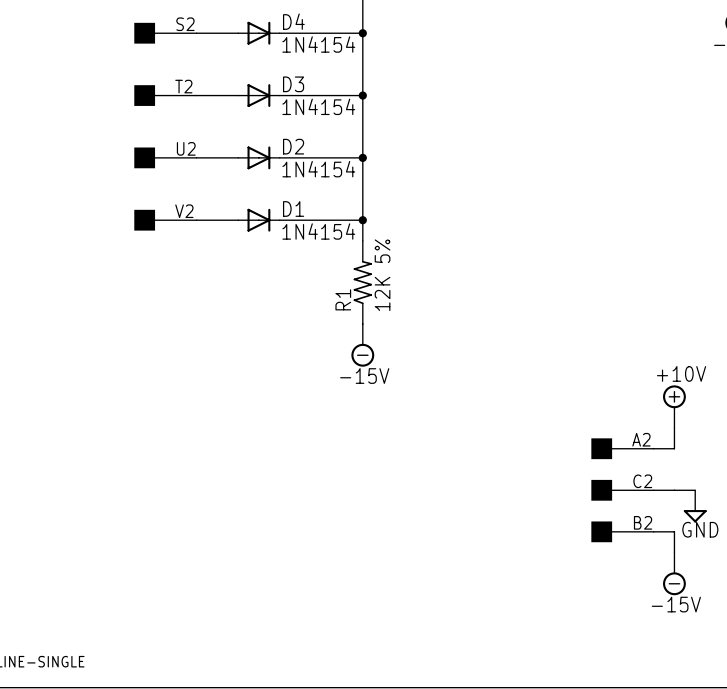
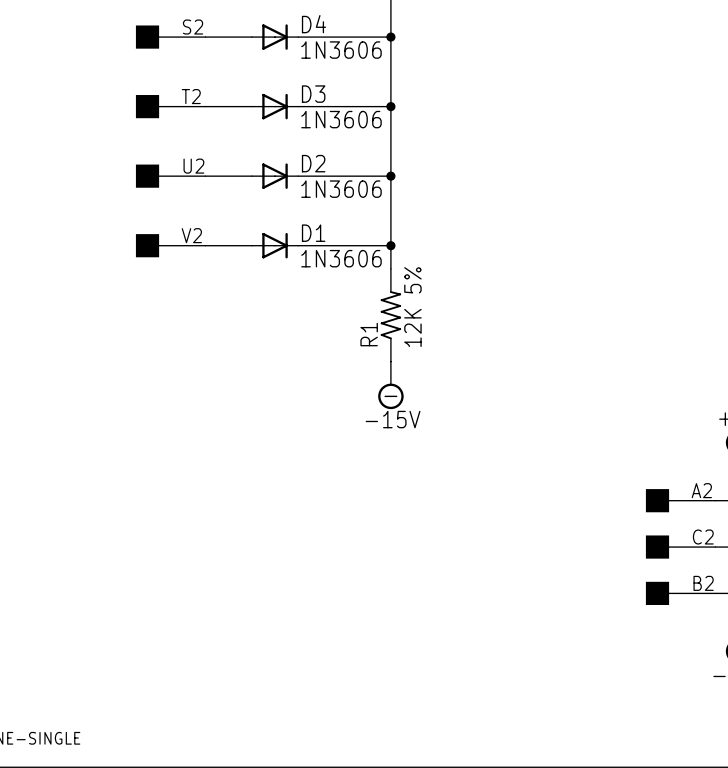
D4 value: 1N4154 (318, 44) -> 1N3606 (341, 50)
D3 value: 1N4154 (318, 106) -> 1N3606 (341, 119)
D2 value: 1N4154 (318, 169) -> 1N3606 (341, 189)
D1 value: 1N4154 (318, 231) -> 1N3606 (341, 258)

